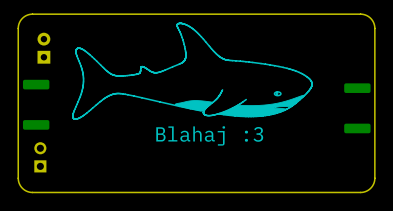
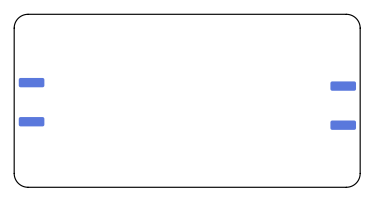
drawing: [72, 22, 313, 120] -> none
part: (43, 48) -> none
text: Blahaj :3 (209, 135) -> none
part: (40, 157) -> none

